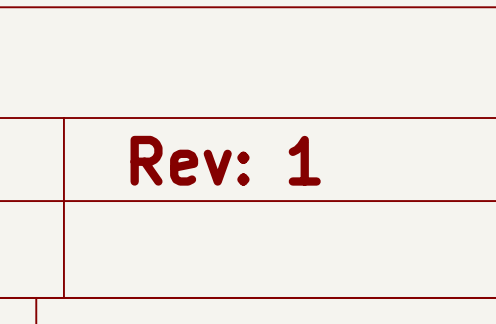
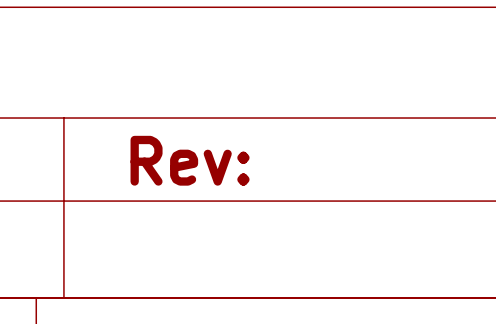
title block: Rev: 1 (225, 160) -> Rev: (190, 160)

